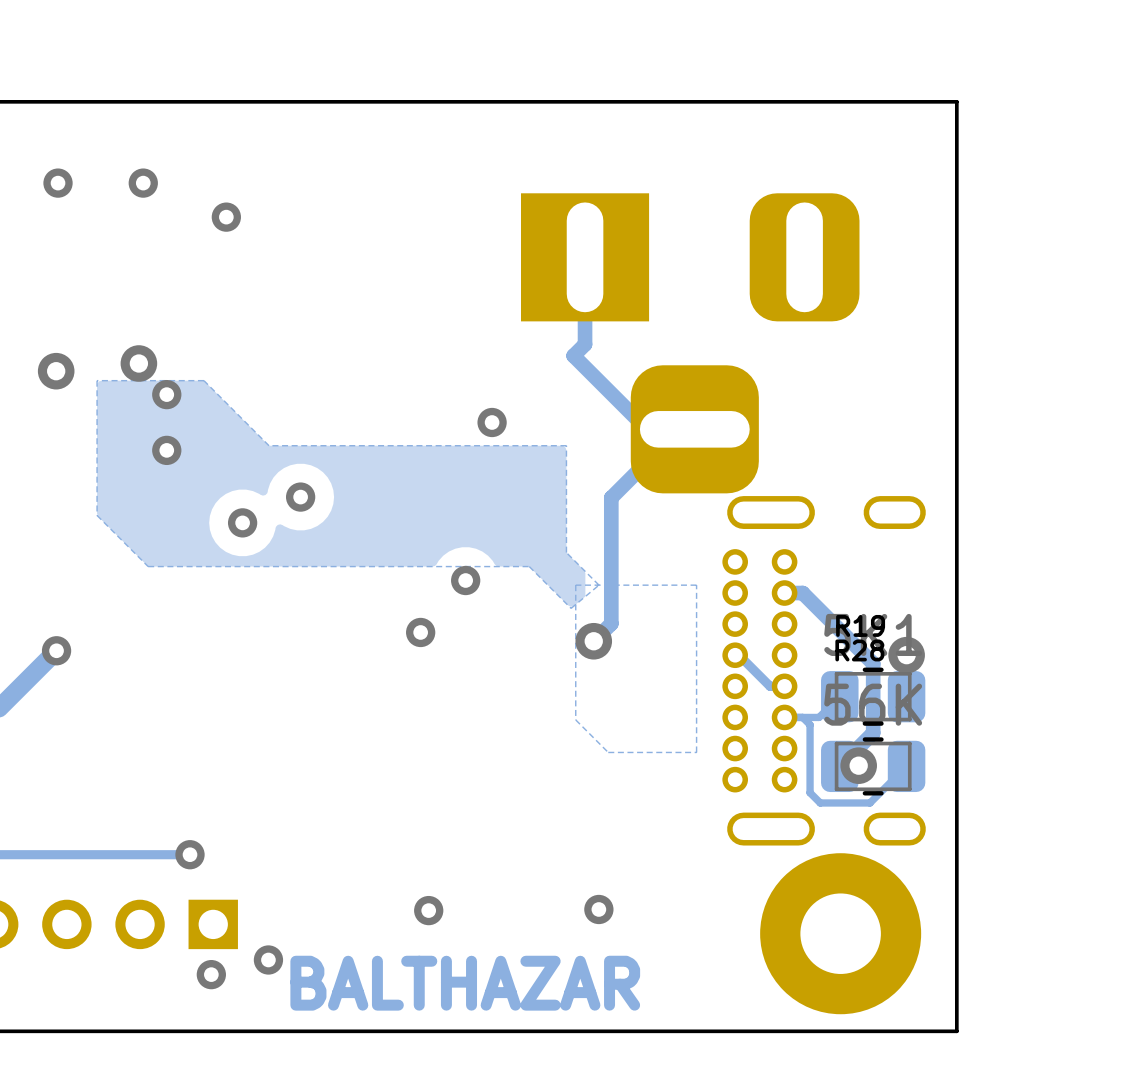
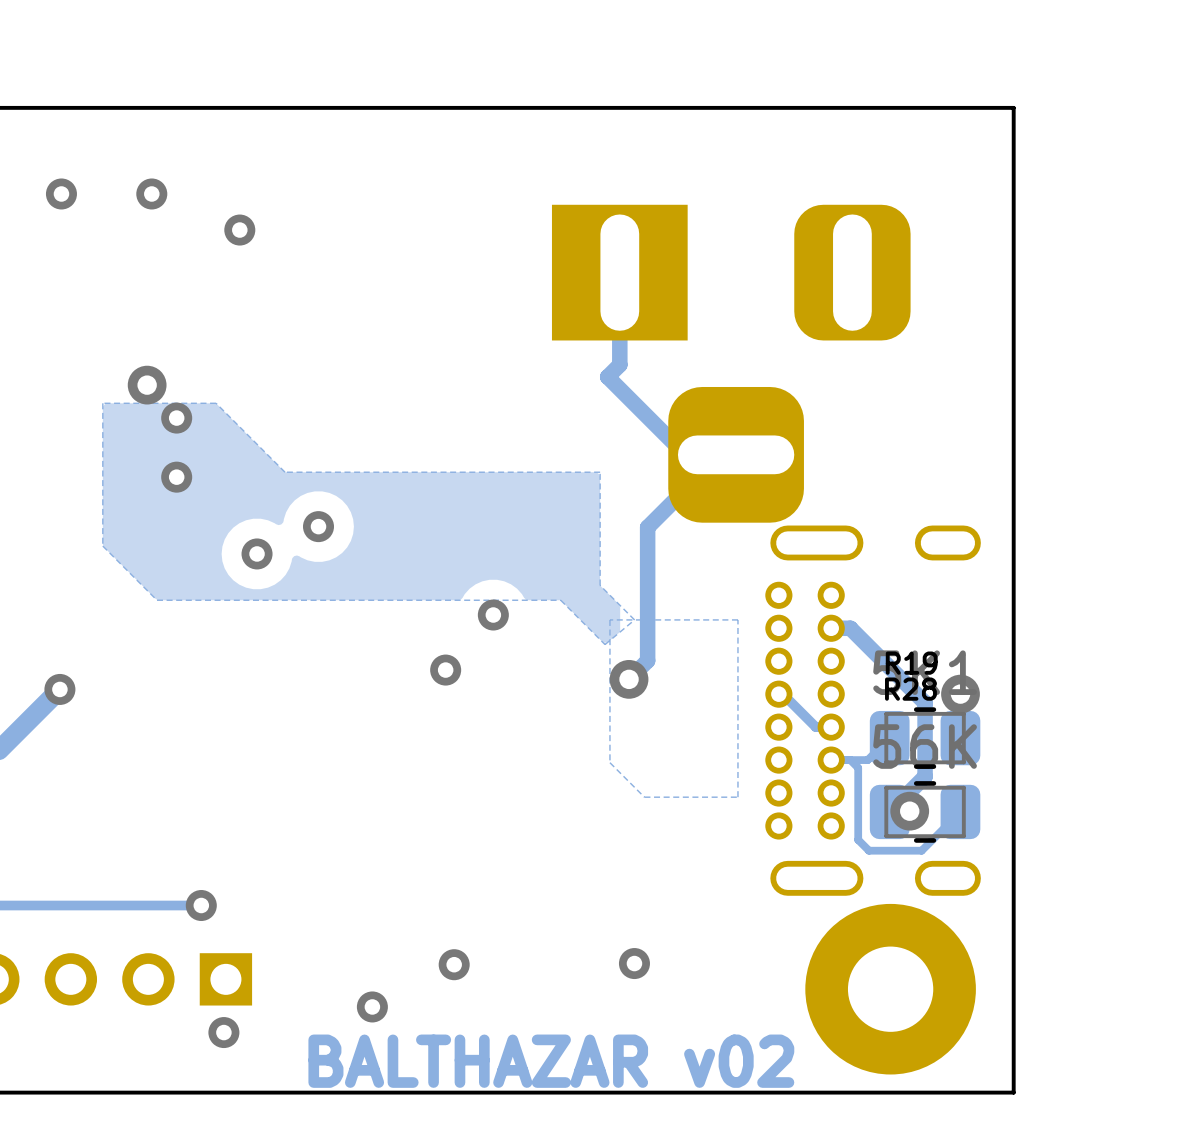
via: (56, 371) -> none
via: (492, 422) -> none
via position: (268, 959) -> (372, 1006)
text: BALTHAZAR (465, 983) -> BALTHAZAR v02 (551, 1061)

